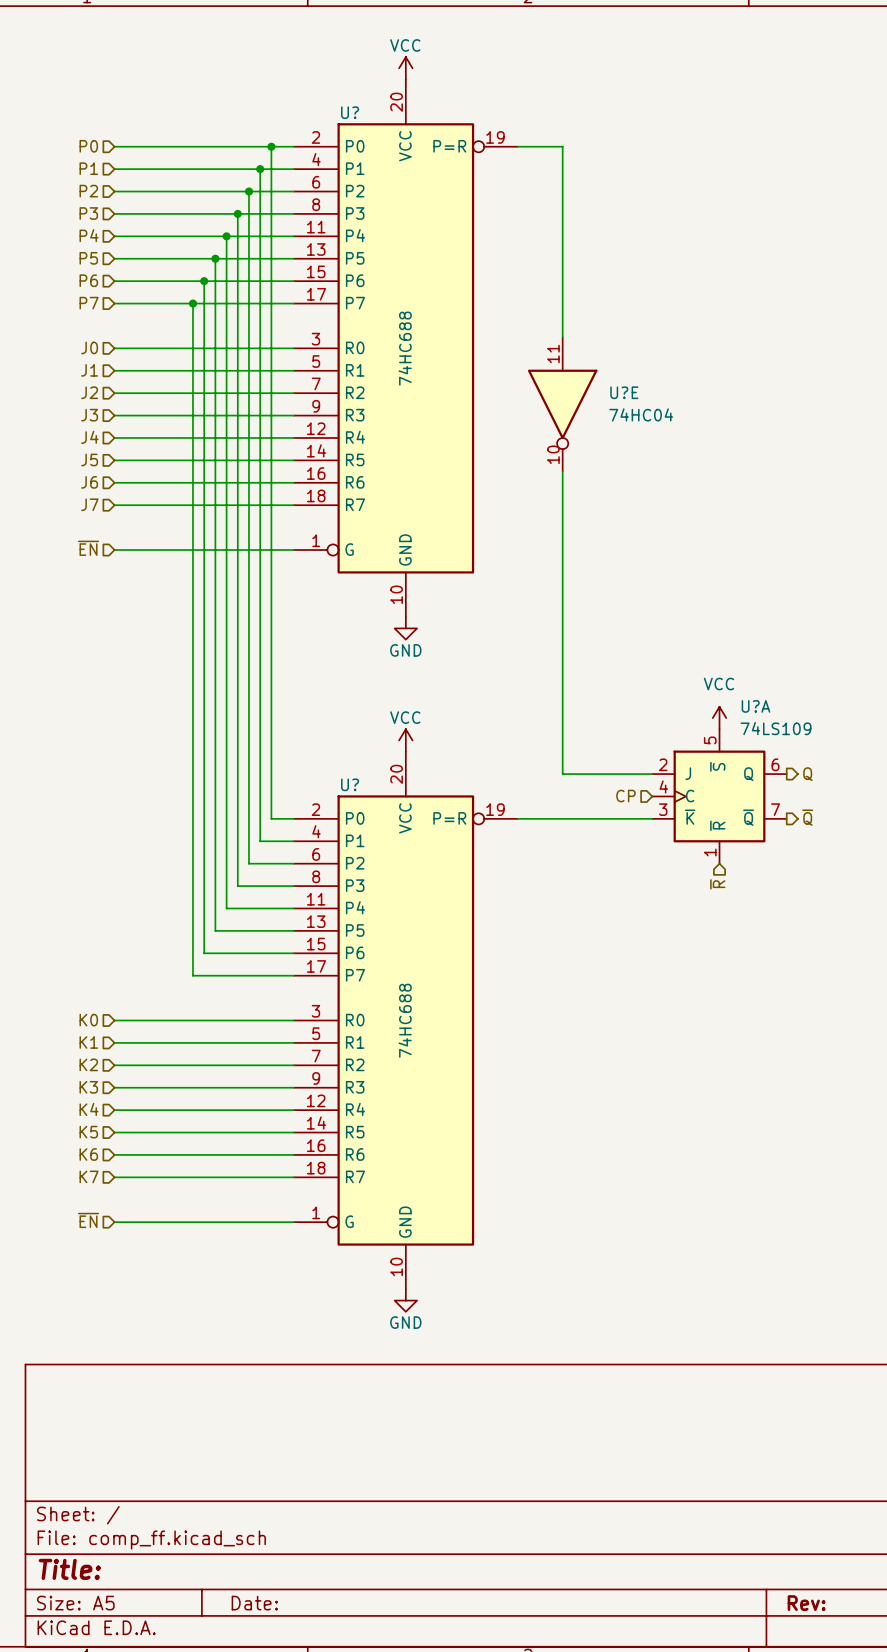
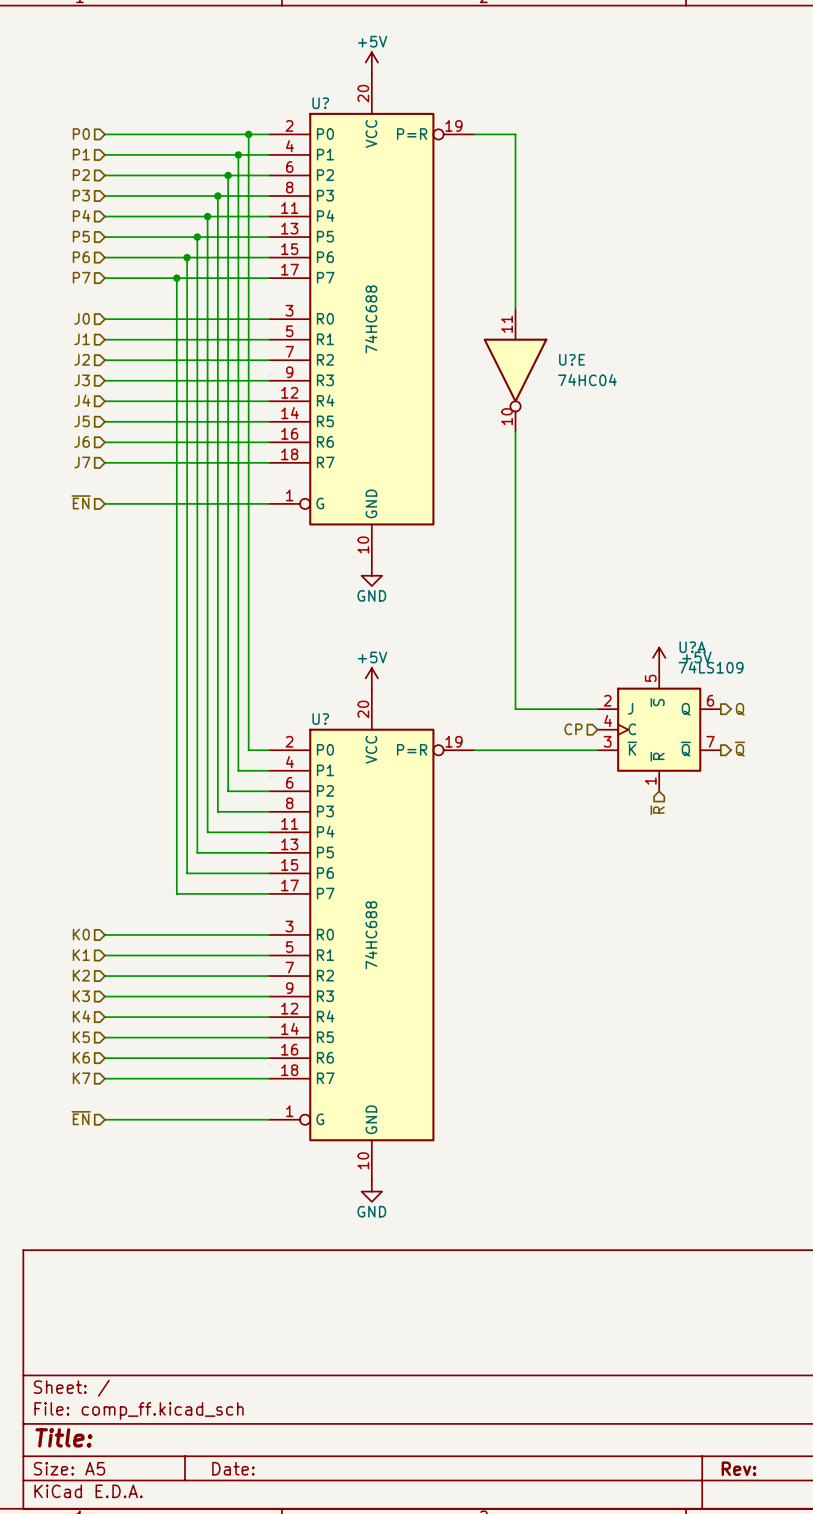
power symbol: VCC (405, 68) -> +5V (371, 62)
power symbol: VCC (719, 718) -> +5V (659, 657)
power symbol: VCC (405, 740) -> +5V (371, 678)

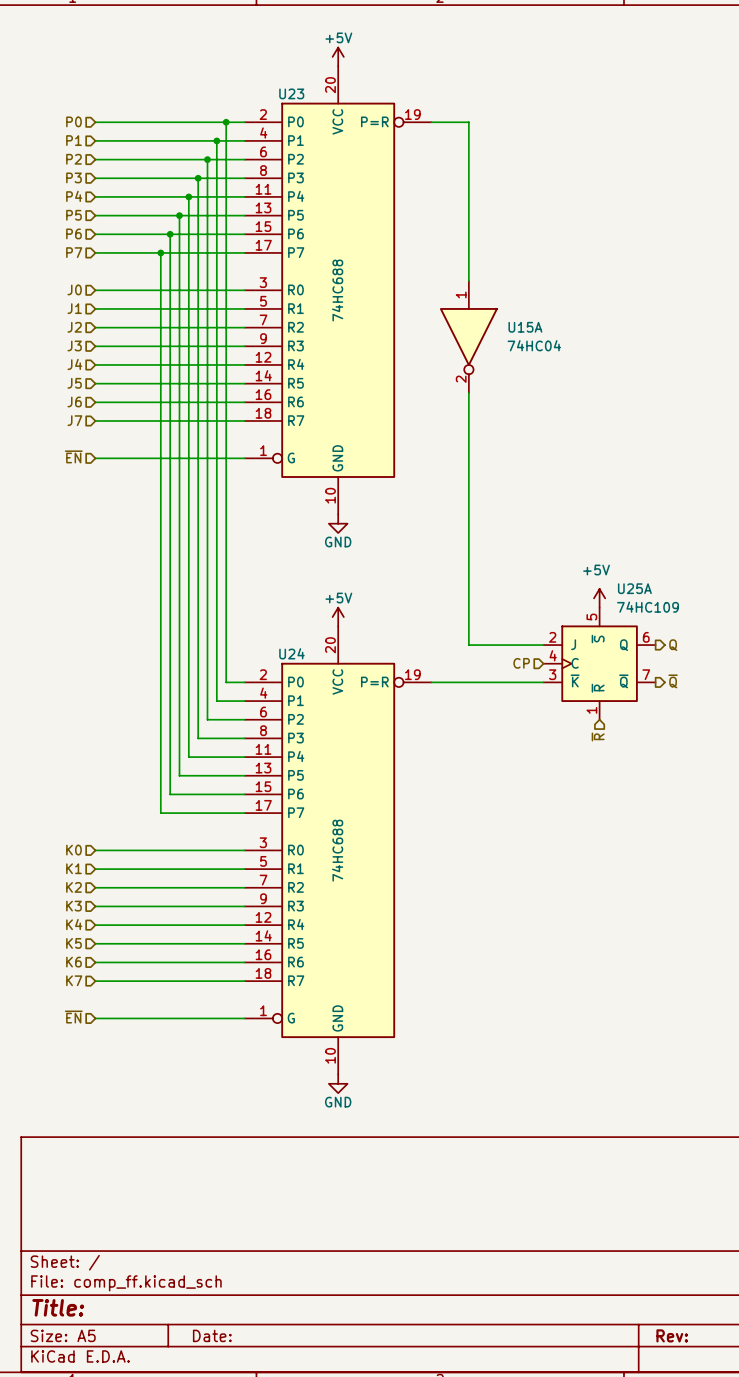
U? name: U? (320, 103) -> U23 (291, 93)
U?E pin number: 11 (507, 324) -> 1 (461, 294)
U?E name: U?E (572, 359) -> U15A (525, 327)
U?E pin number: 10 (507, 416) -> 2 (461, 379)
U?A name: U?A (692, 647) -> U25A (634, 588)
power symbol text position: +5V (696, 657) -> +5V (596, 570)
U?A value: 74LS109 (710, 667) -> 74HC109 (648, 607)
U? name: U? (320, 719) -> U24 (291, 653)

